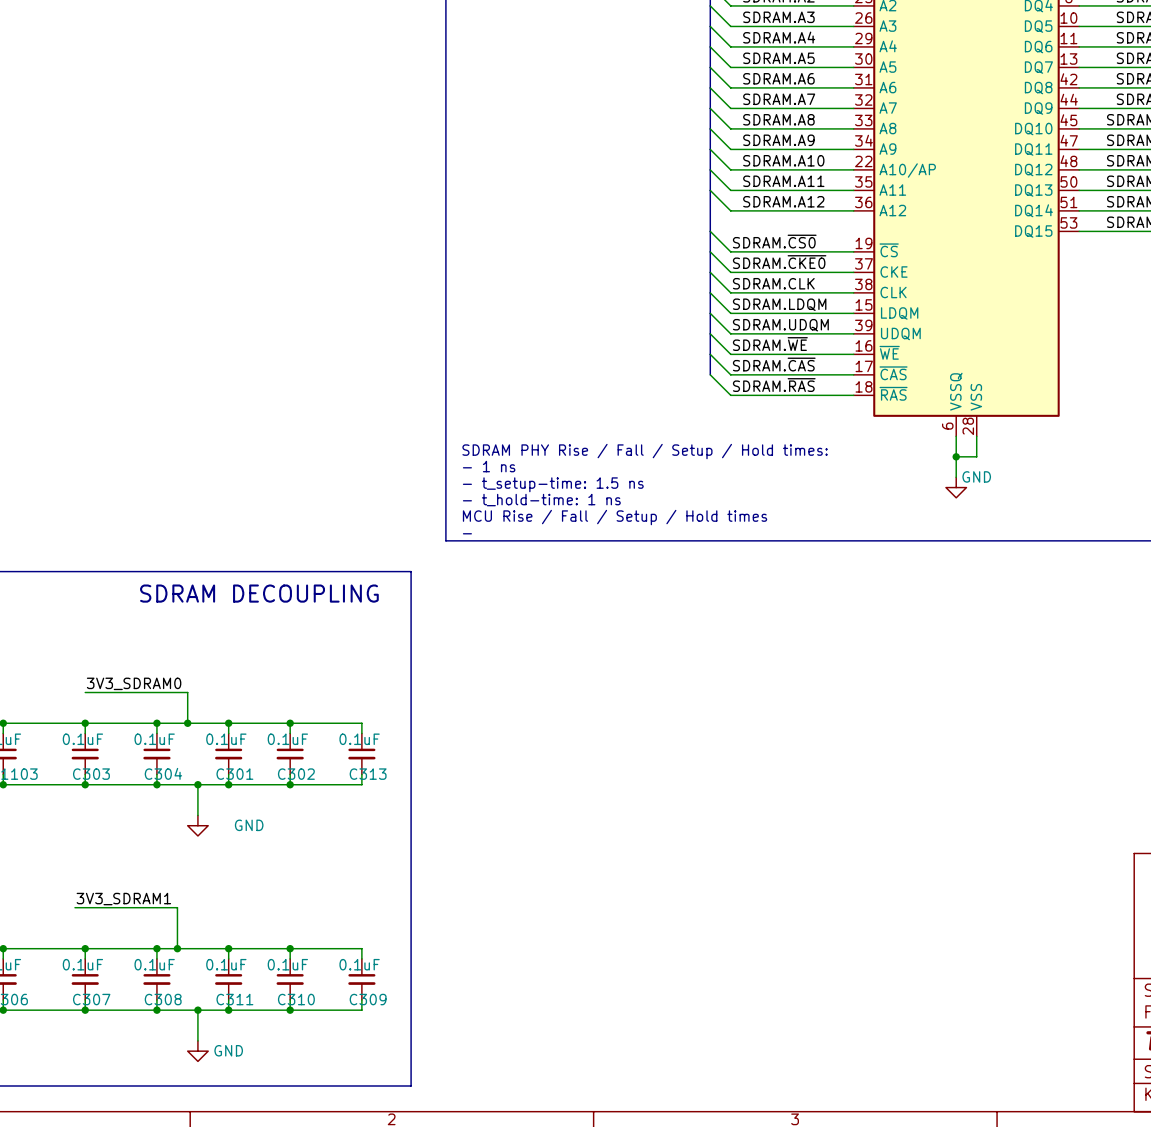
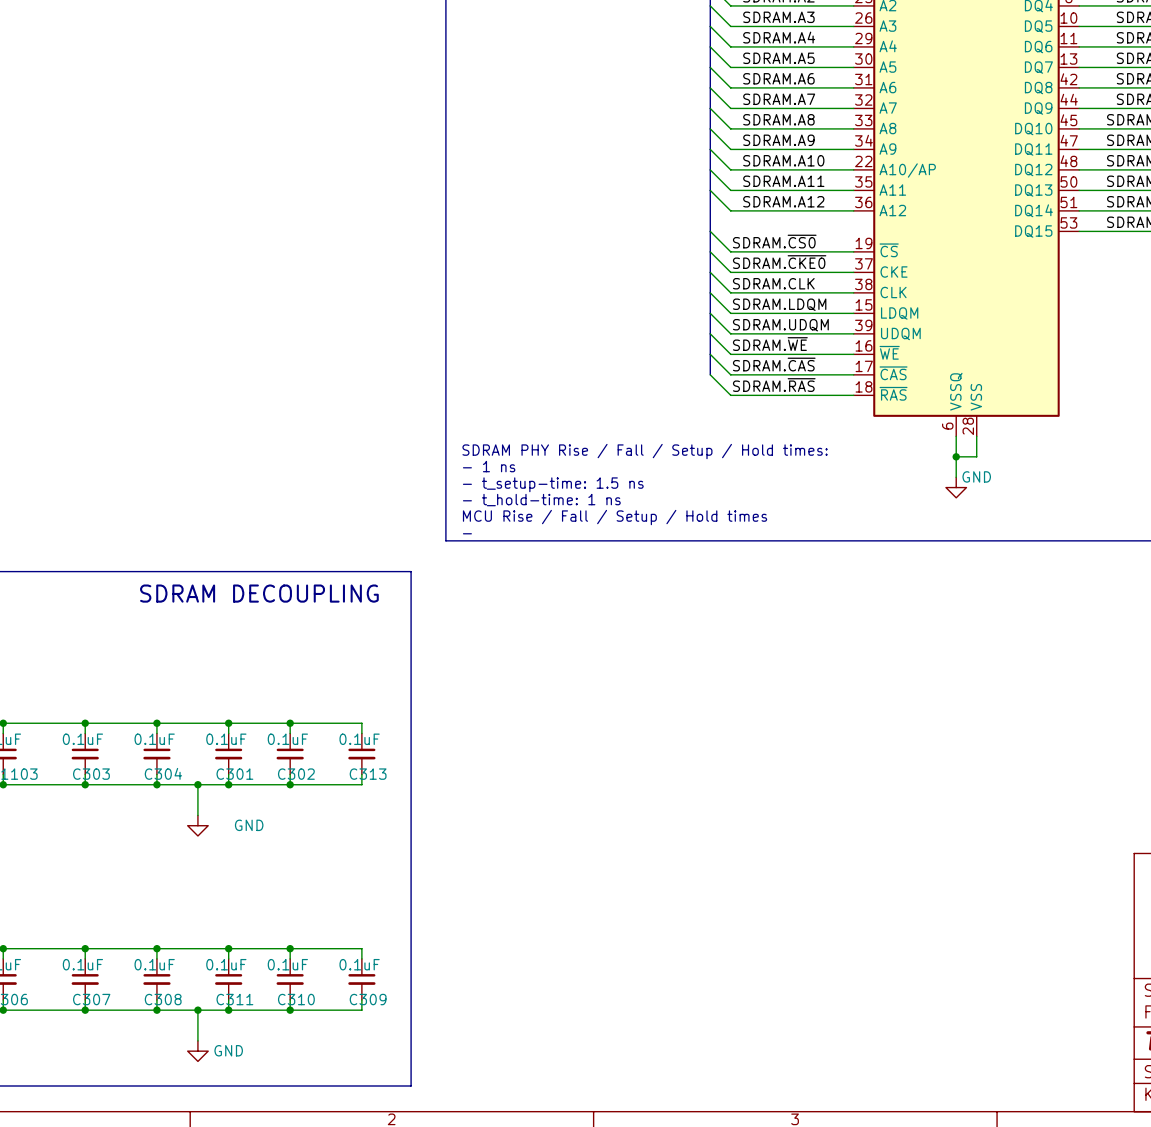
label: 3V3_SDRAM0 (134, 683) -> none
wire: (85, 692) (187, 692) (187, 723) -> none
junction: (187, 723) -> none
label: 3V3_SDRAM1 (123, 899) -> none
wire: (74, 907) (177, 907) (177, 948) -> none
junction: (177, 948) -> none

